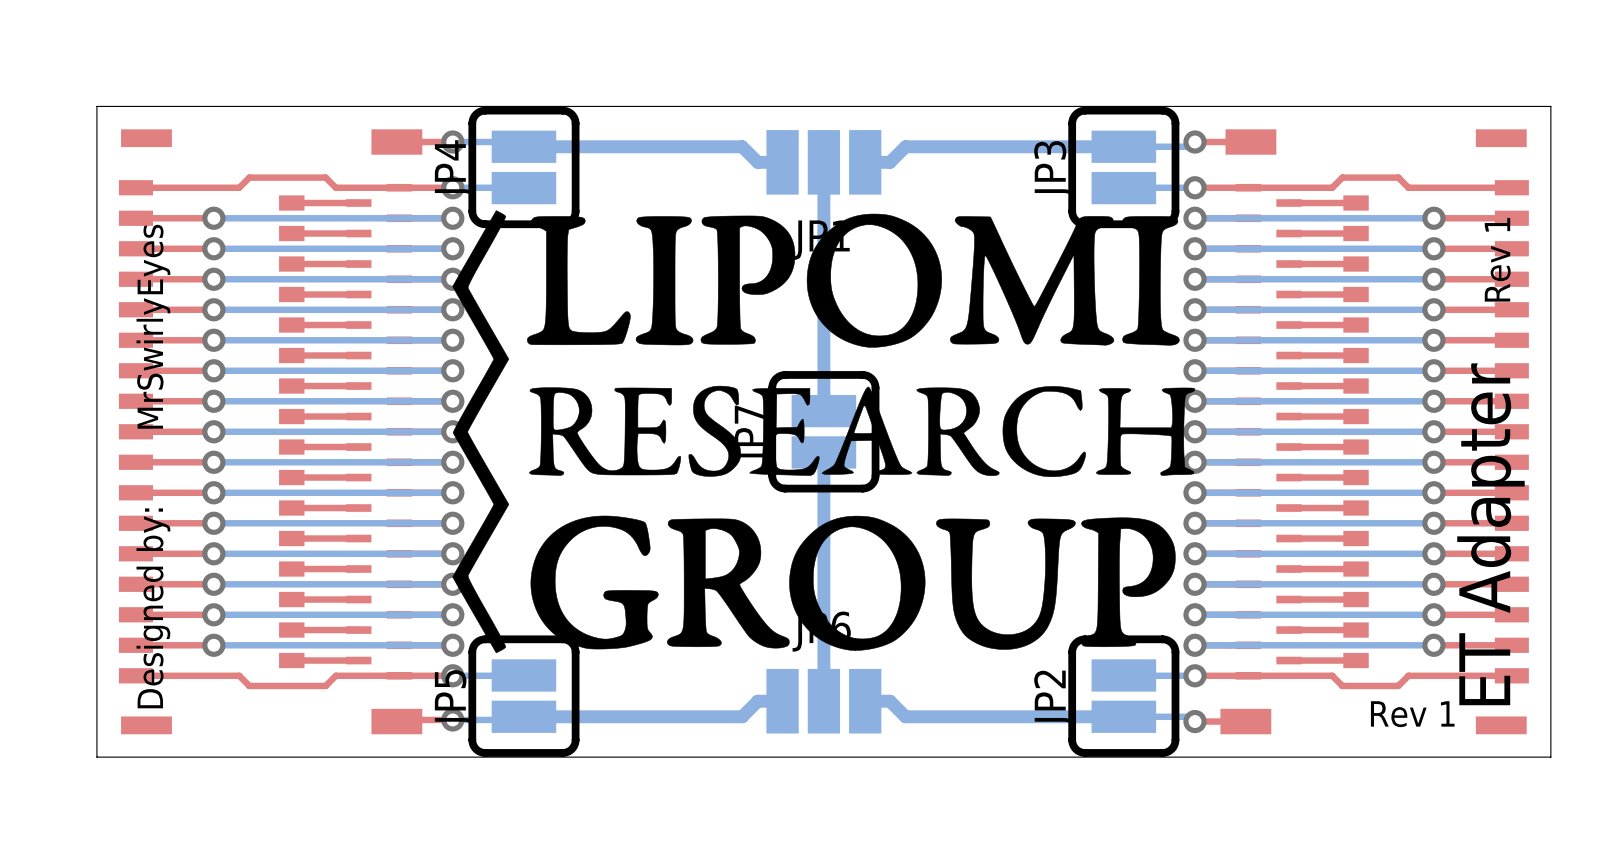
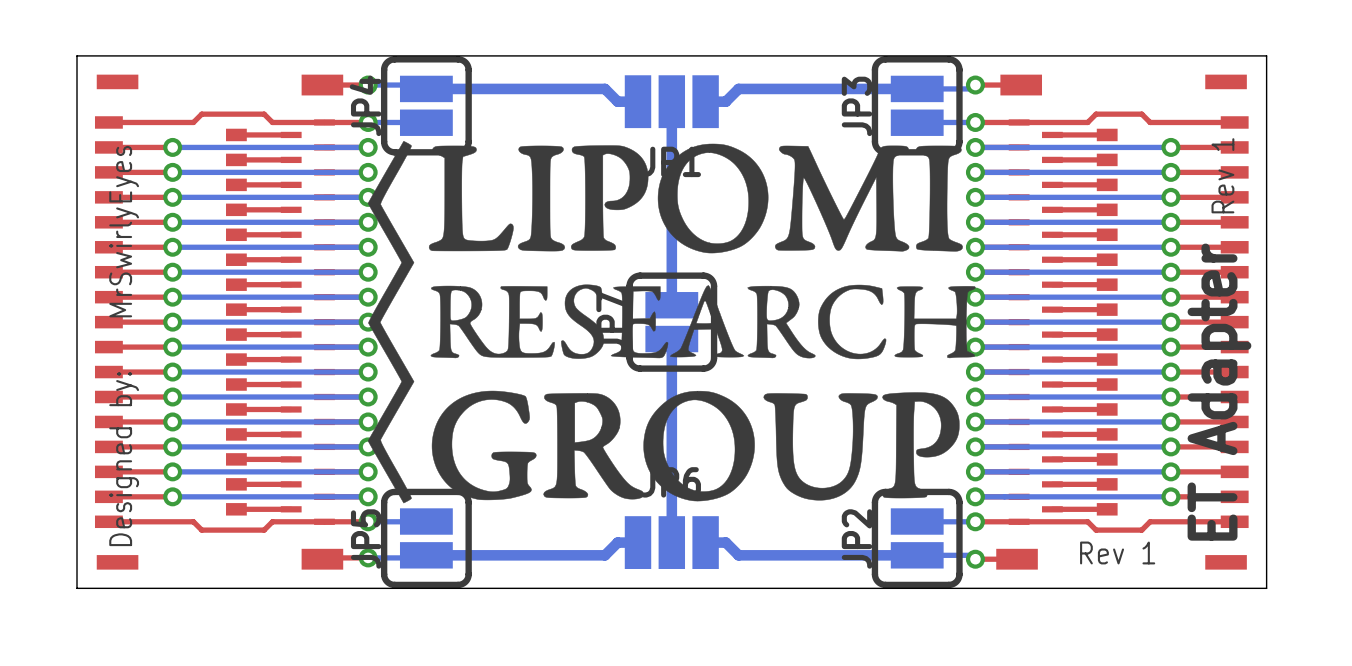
text position: Rev 1 (1412, 714) -> Rev 1 (1117, 552)

